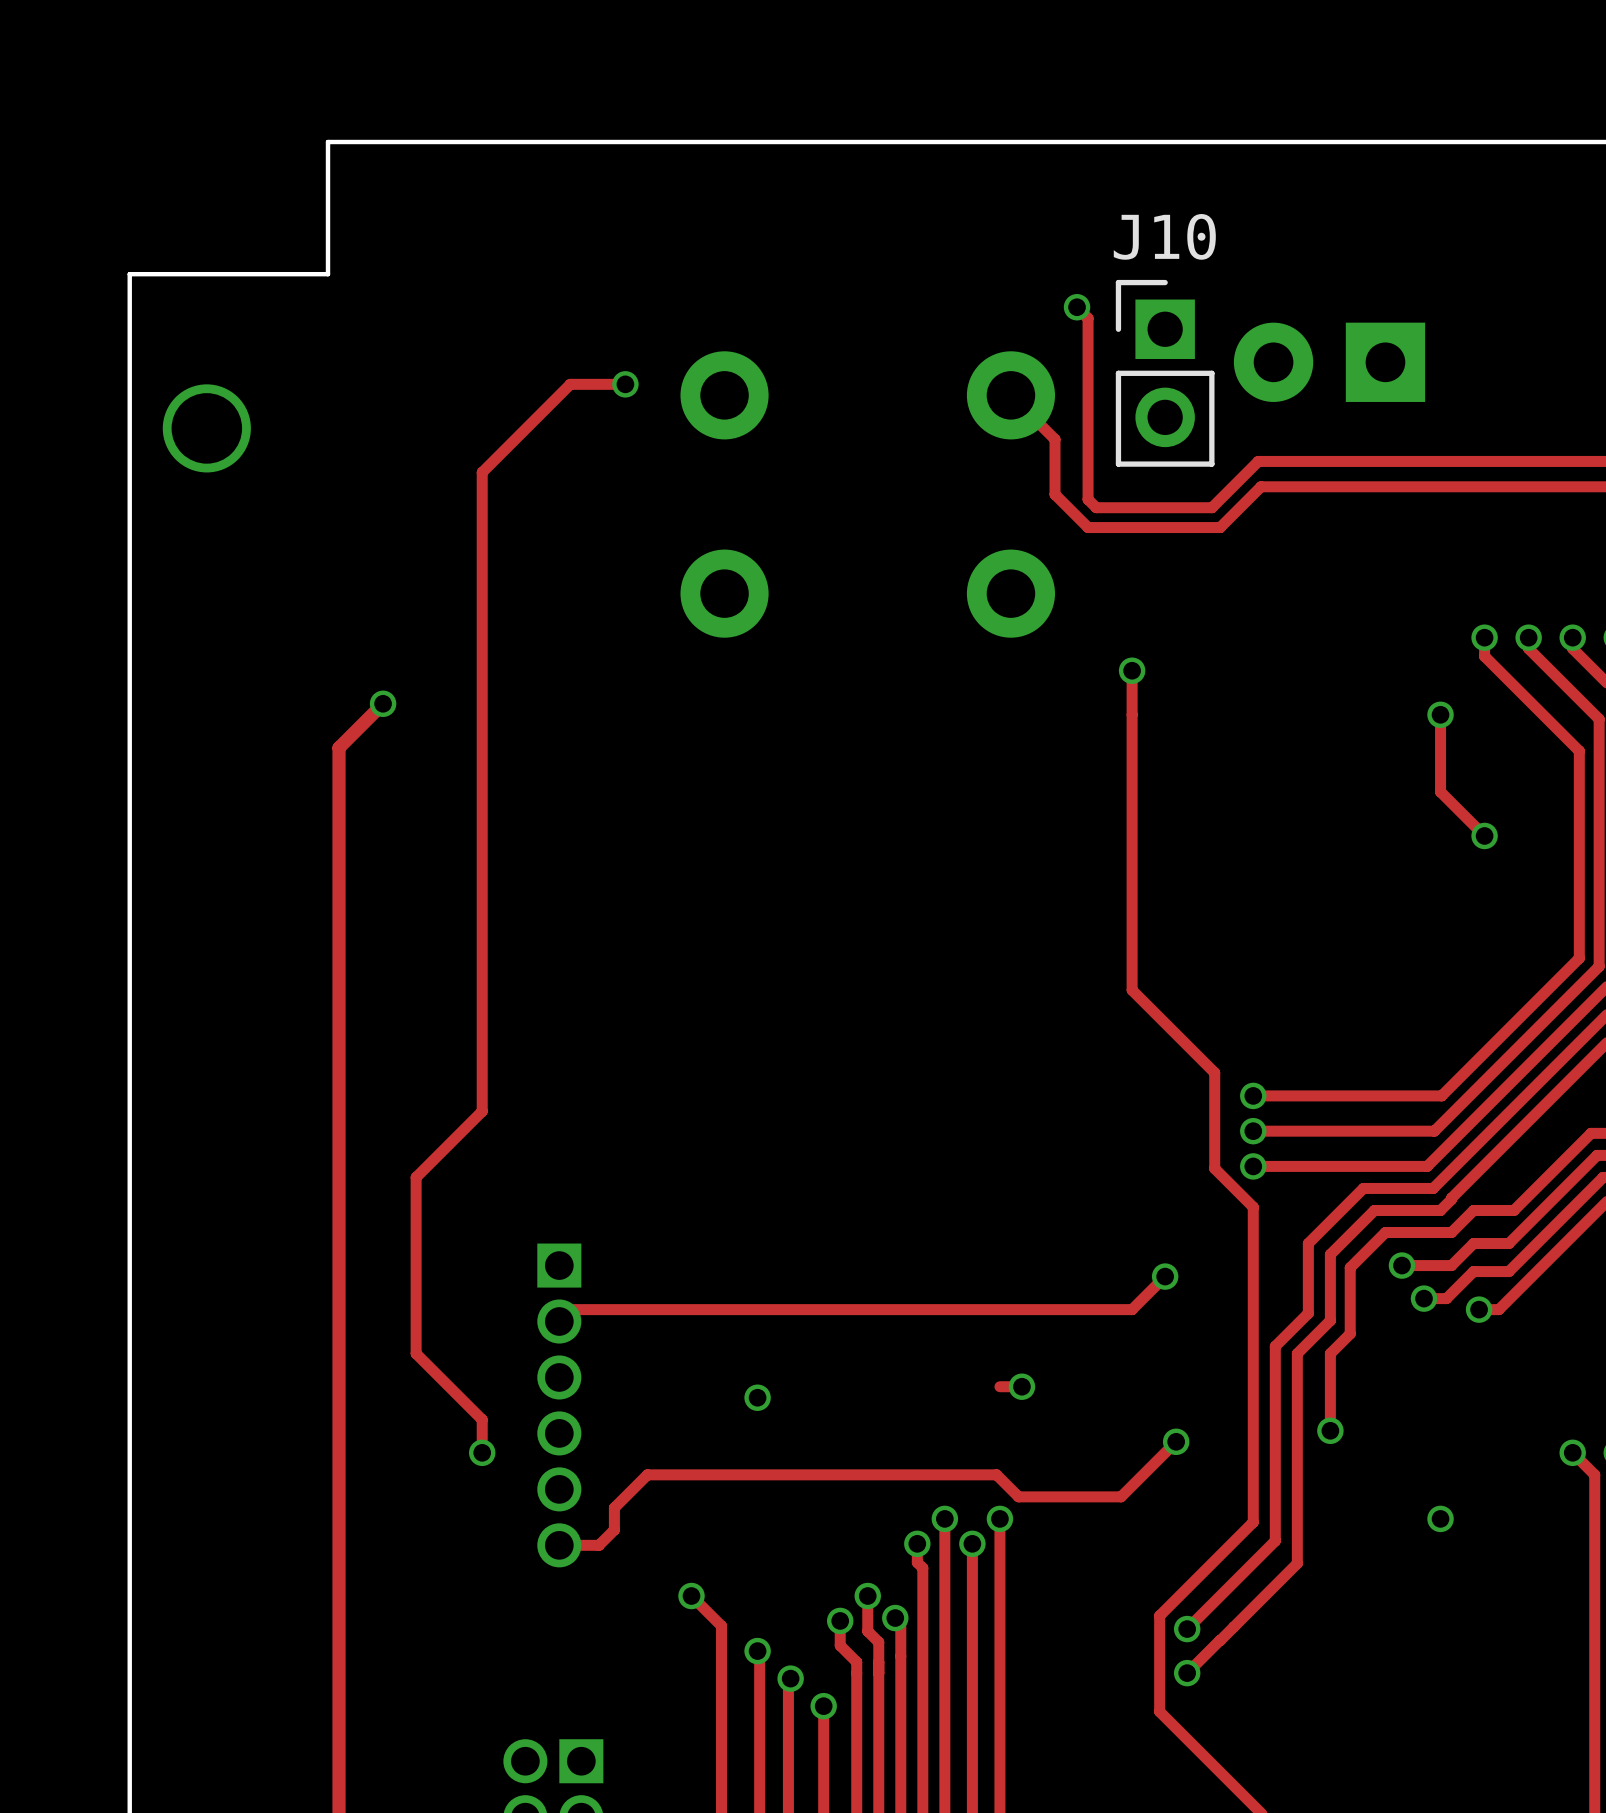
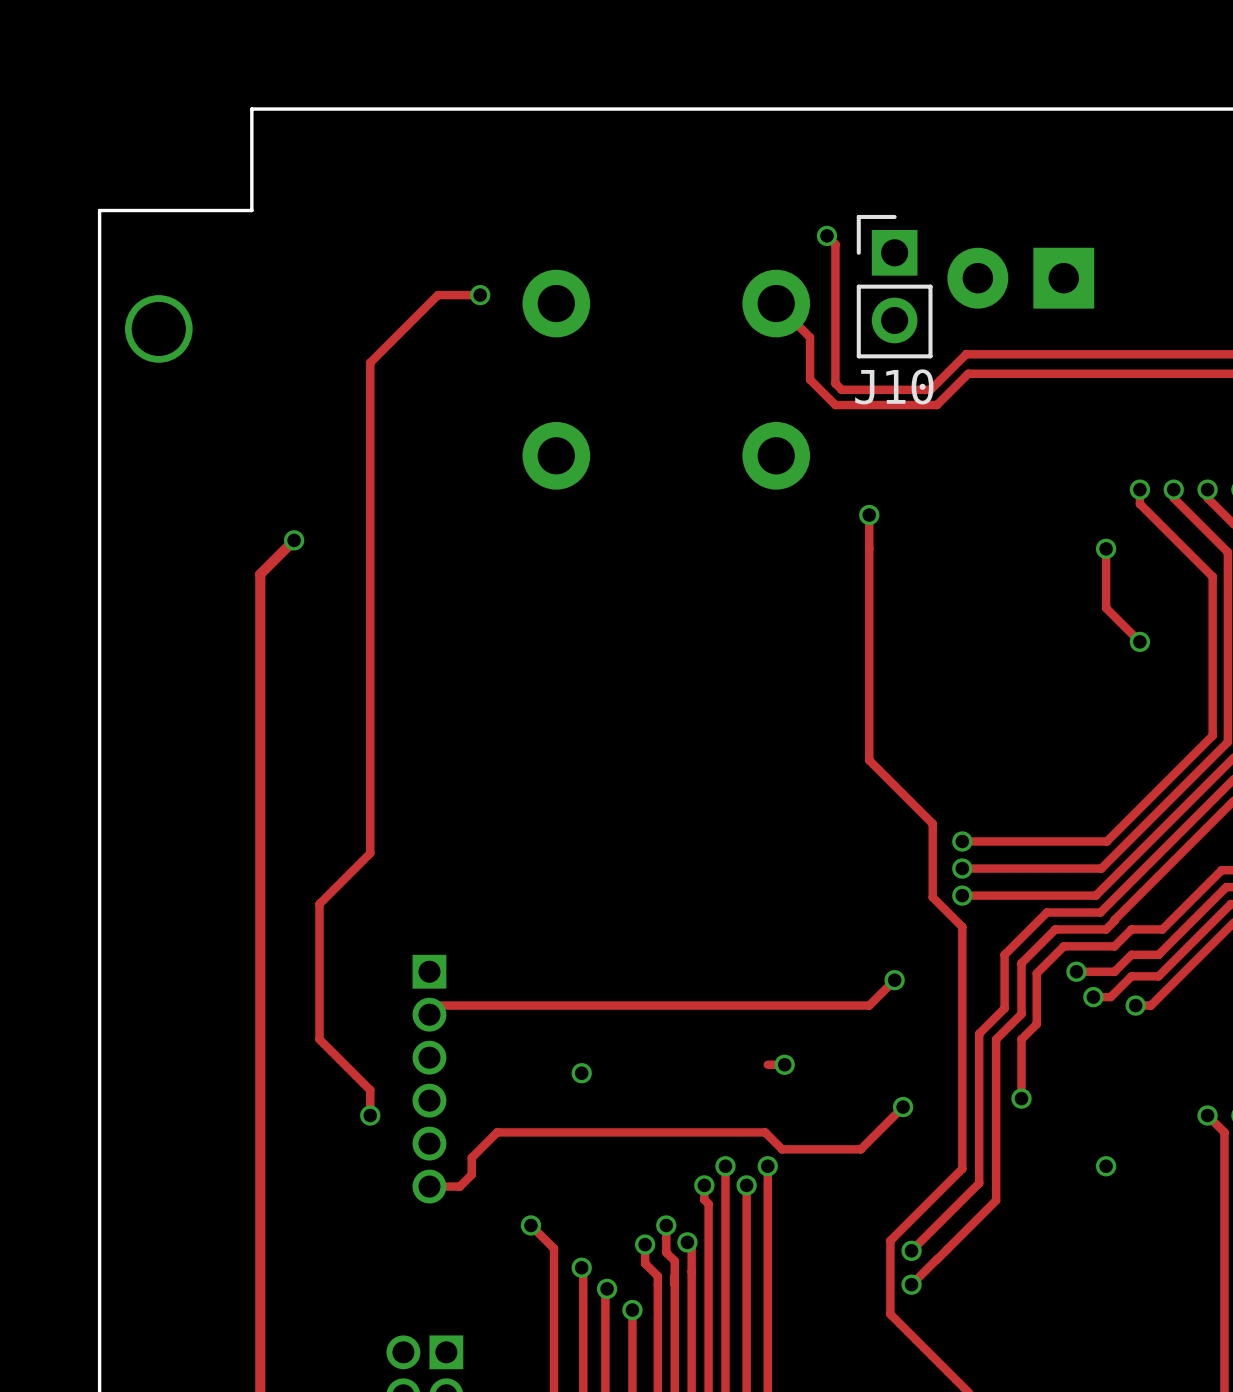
J10 name position: J10 (1164, 236) -> J10 (894, 386)

